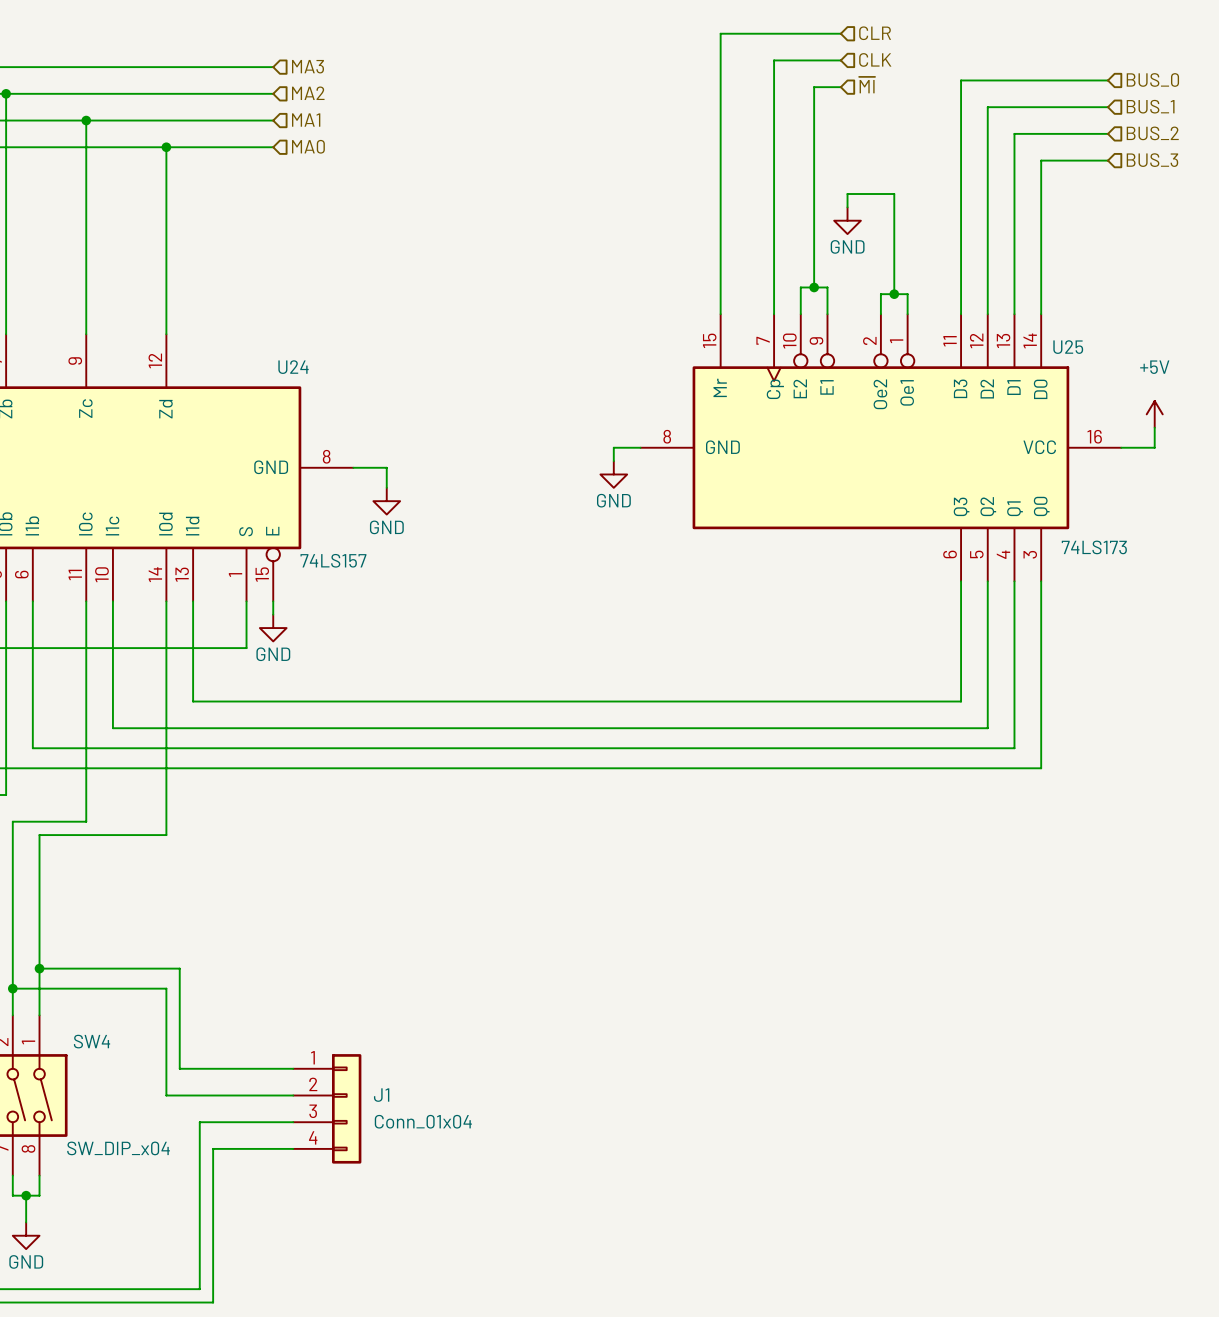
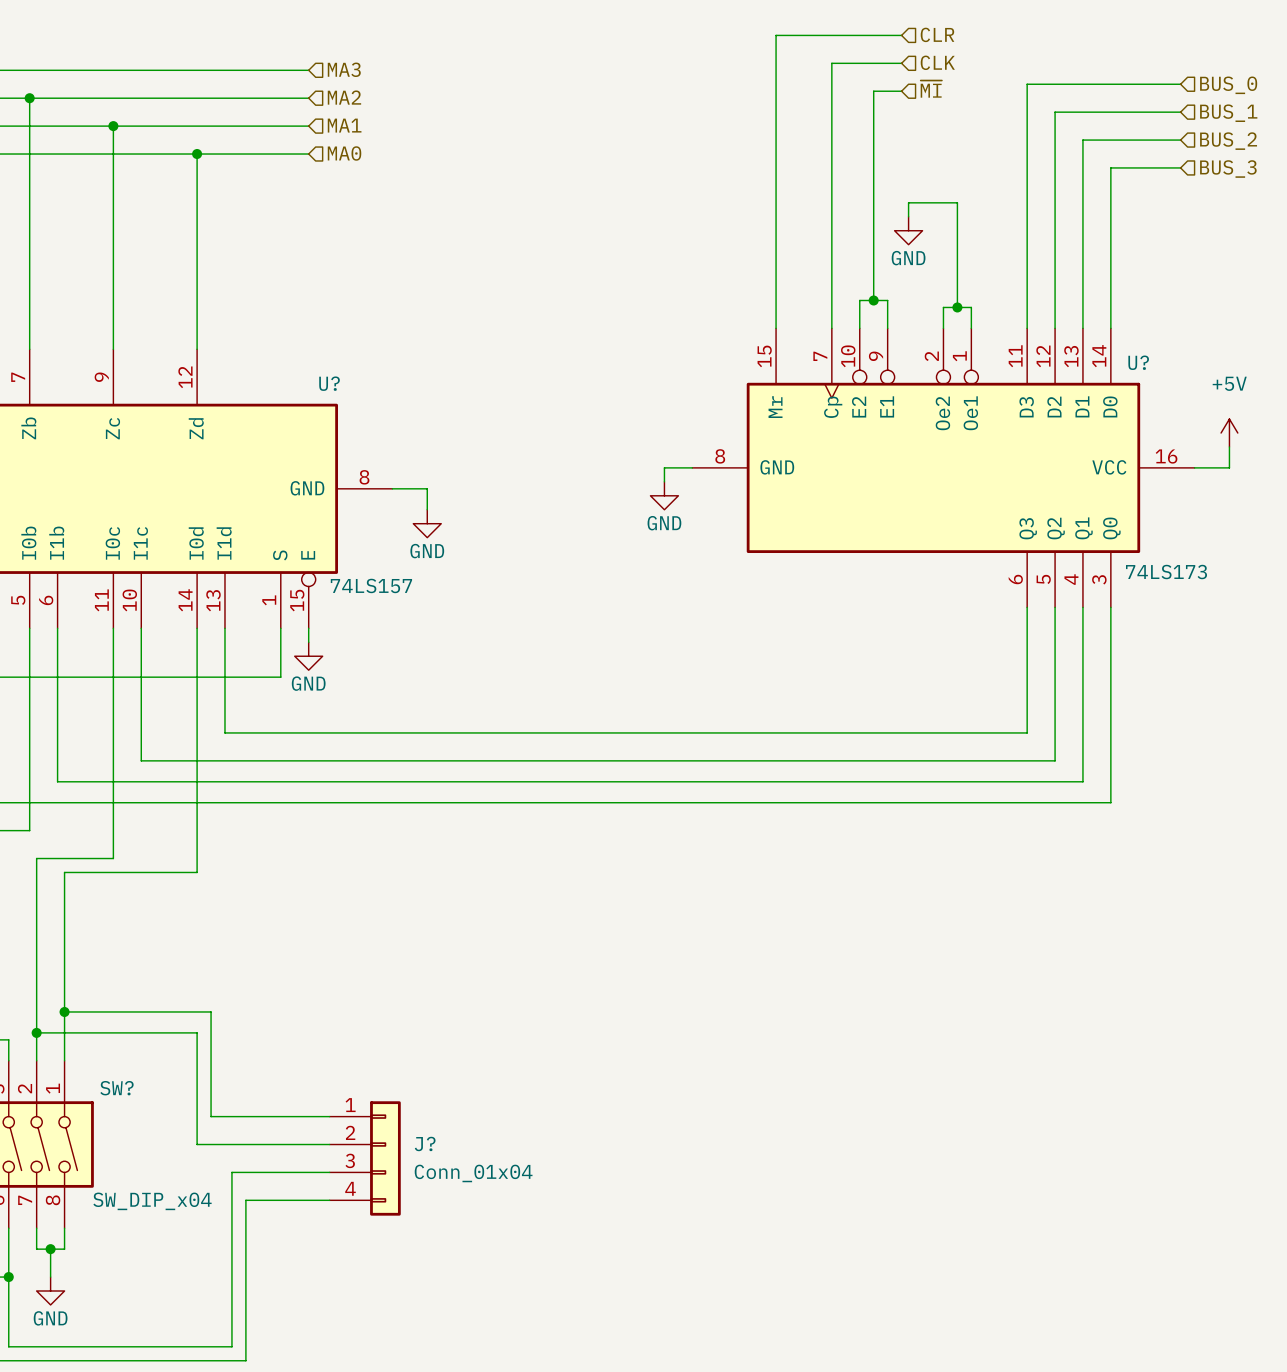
U25 name: U25 (1068, 347) -> U? (1138, 362)
U24 name: U24 (293, 367) -> U? (329, 383)
SW4 name: SW4 (92, 1041) -> SW? (116, 1088)
J1 name: J1 (381, 1095) -> J? (425, 1143)

